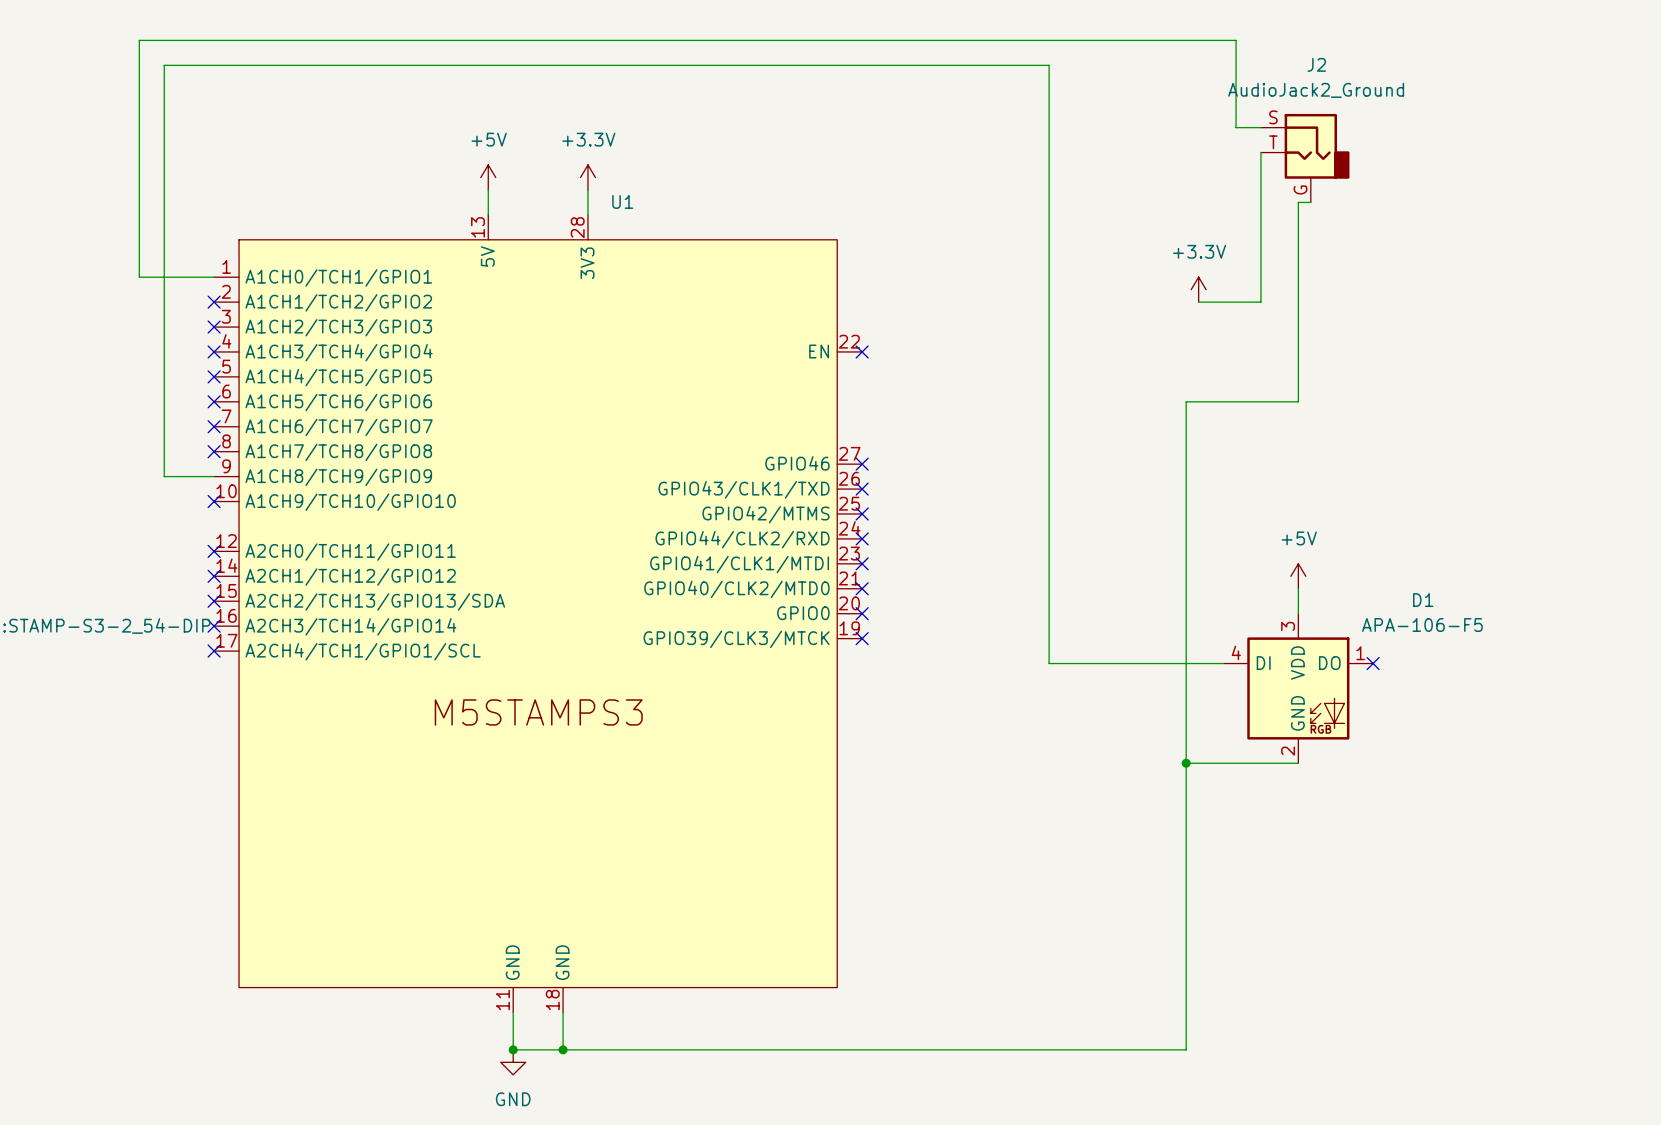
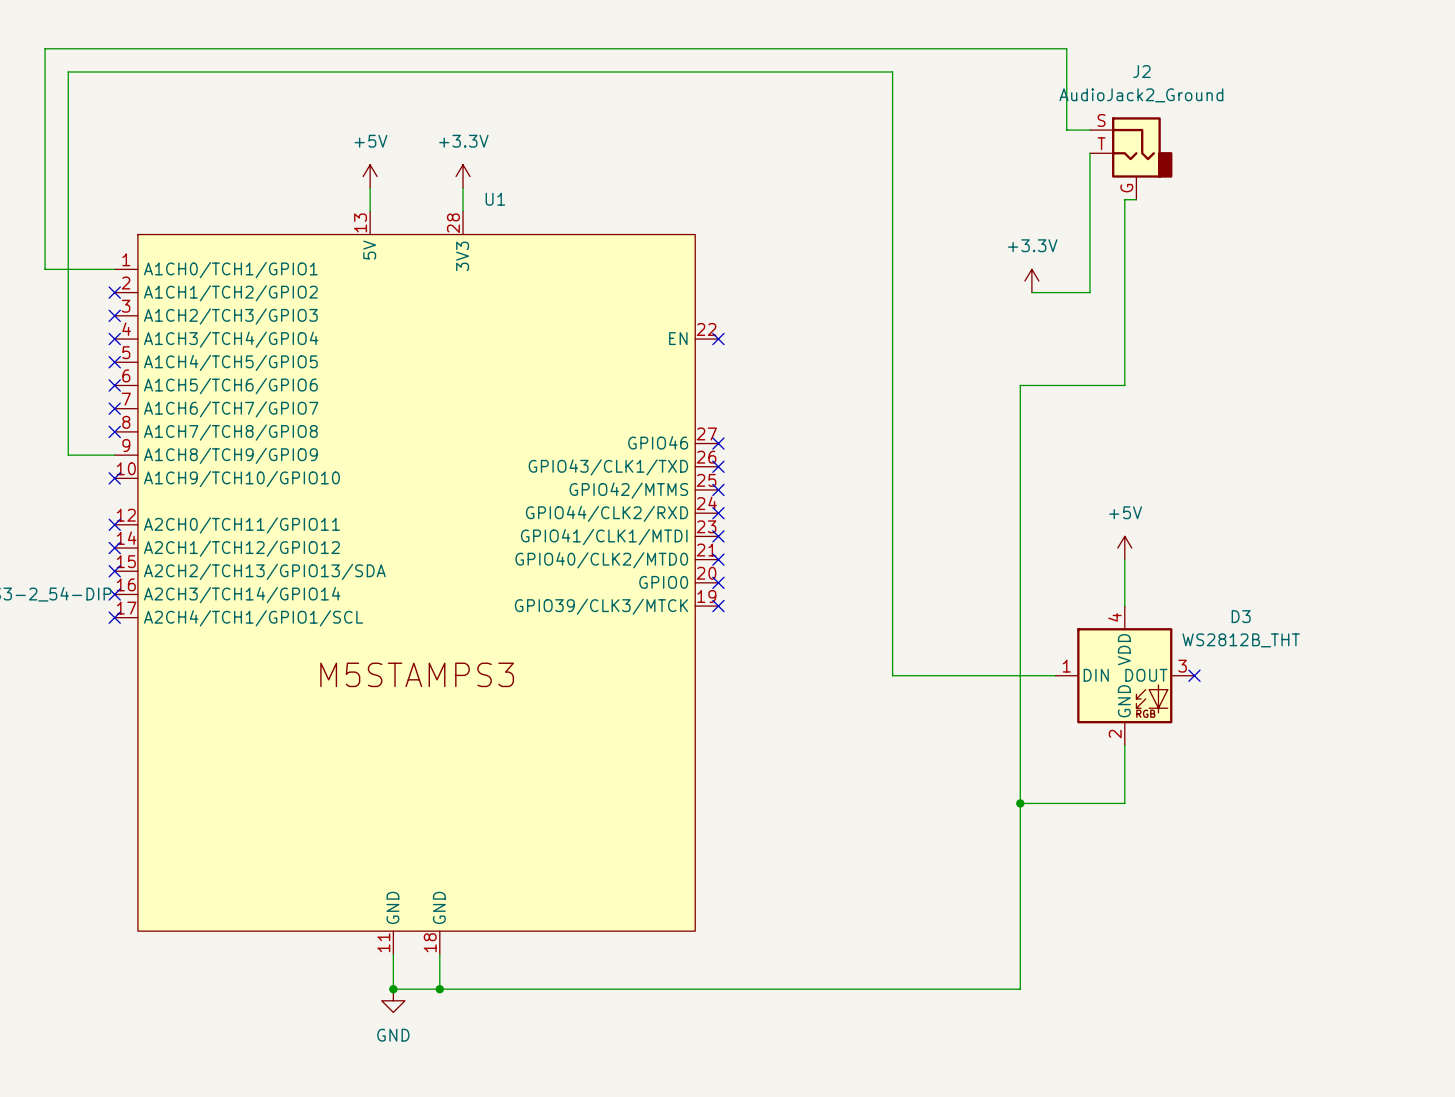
wire: (1049, 663) (1223, 663) -> (892, 629) (892, 675) (1055, 675)
no-connect mark position: (1373, 663) -> (1194, 675)
D1: APA-106-F5 (1298, 688) -> none
D3: none -> WS2812B_THT (1124, 675)
wire: (1186, 763) (1298, 763) -> none
junction: (1186, 763) -> none
wire: none -> (1124, 745) (1124, 803) (1020, 803)
junction: none -> (1020, 803)

